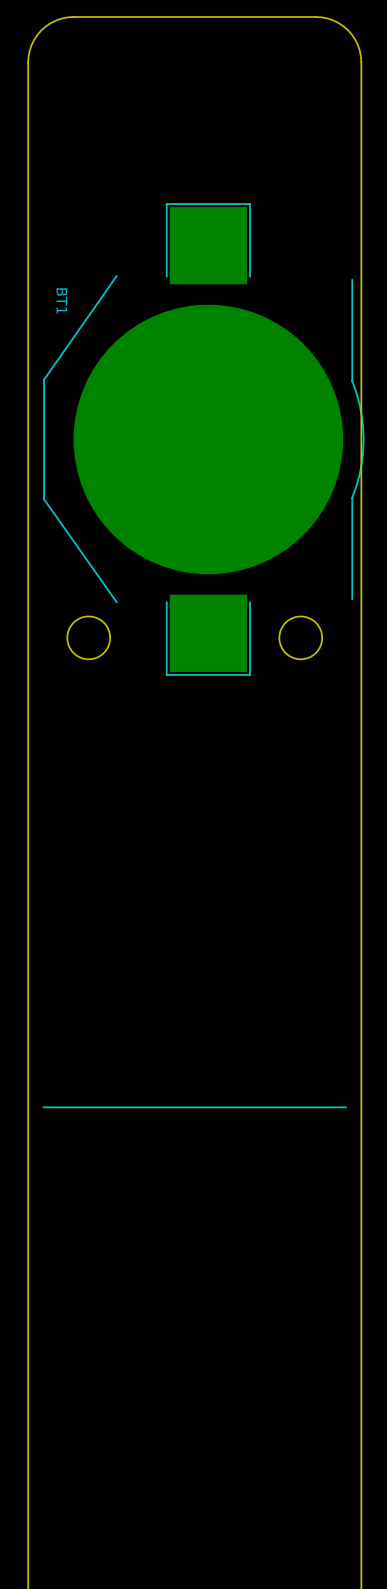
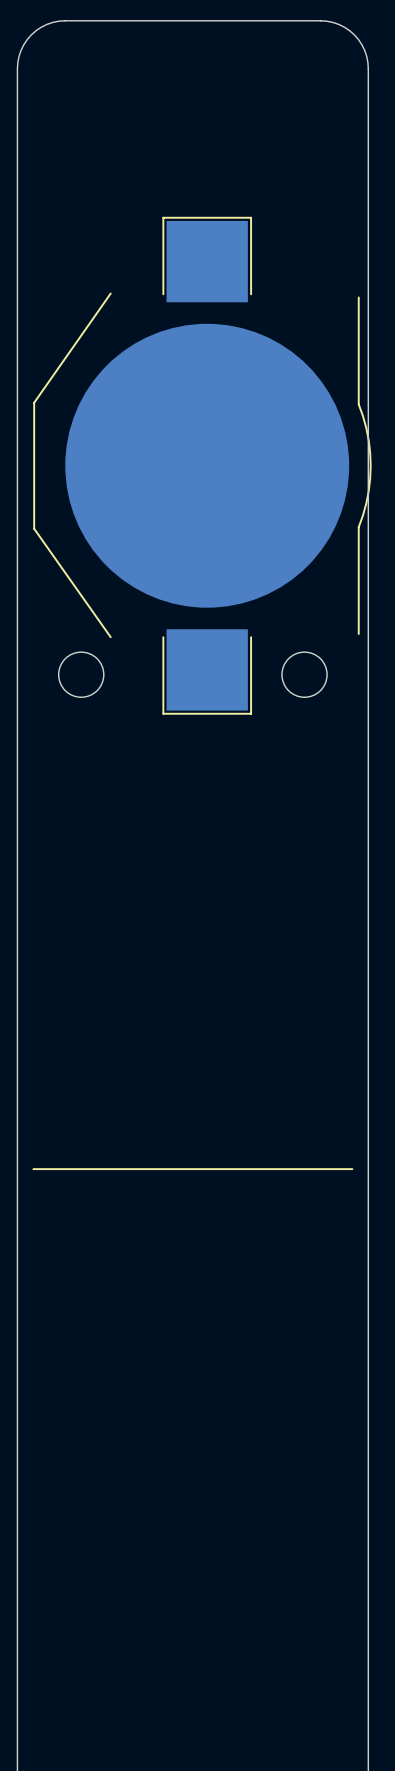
BT1 name: BT1 (61, 300) -> none

